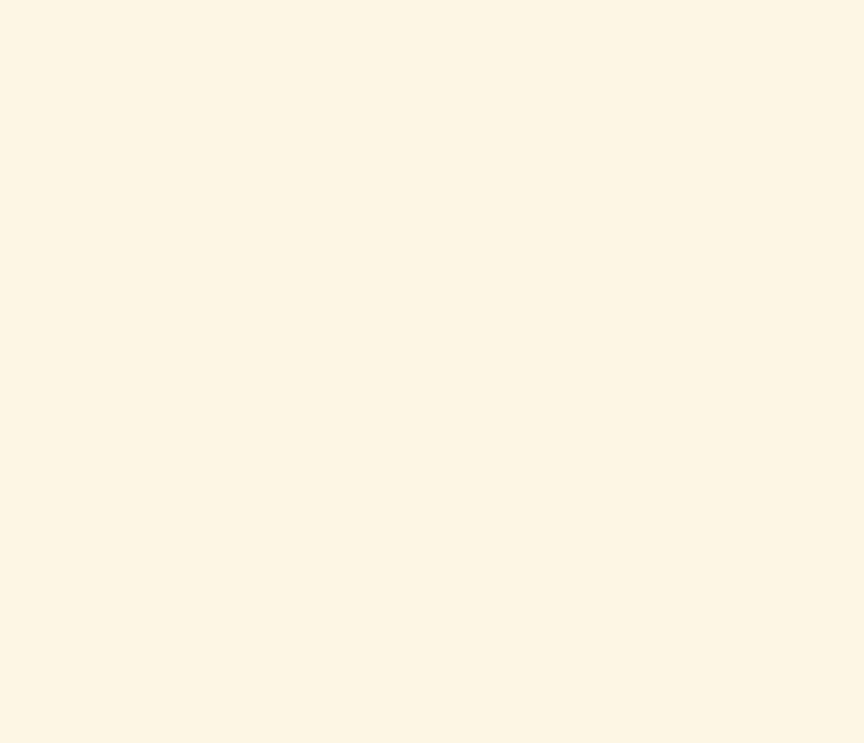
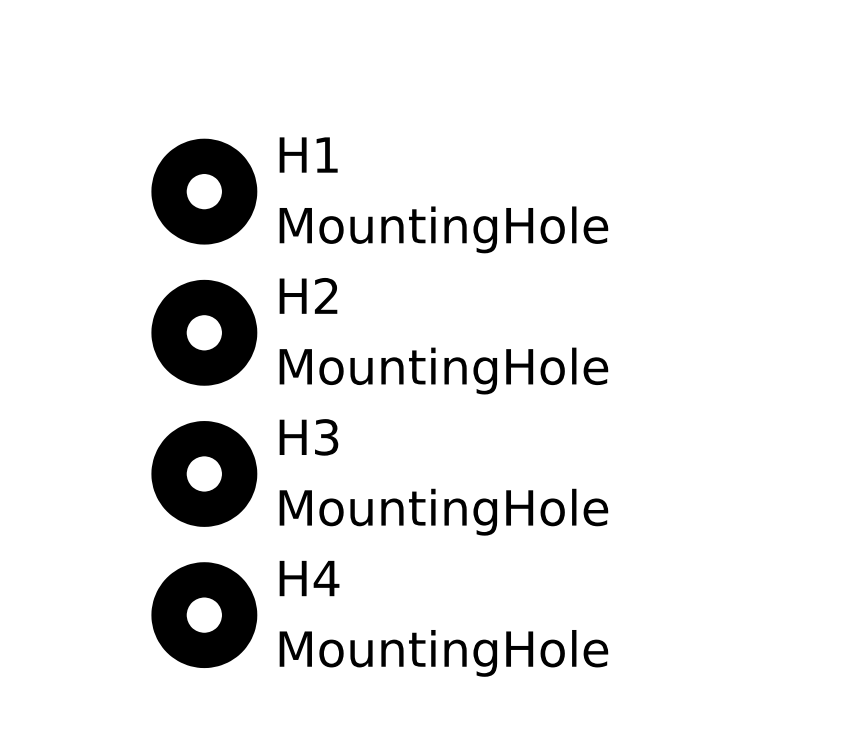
H1: none -> MountingHole (204, 191)
H2: none -> MountingHole (204, 332)
H3: none -> MountingHole (204, 473)
H4: none -> MountingHole (204, 615)

